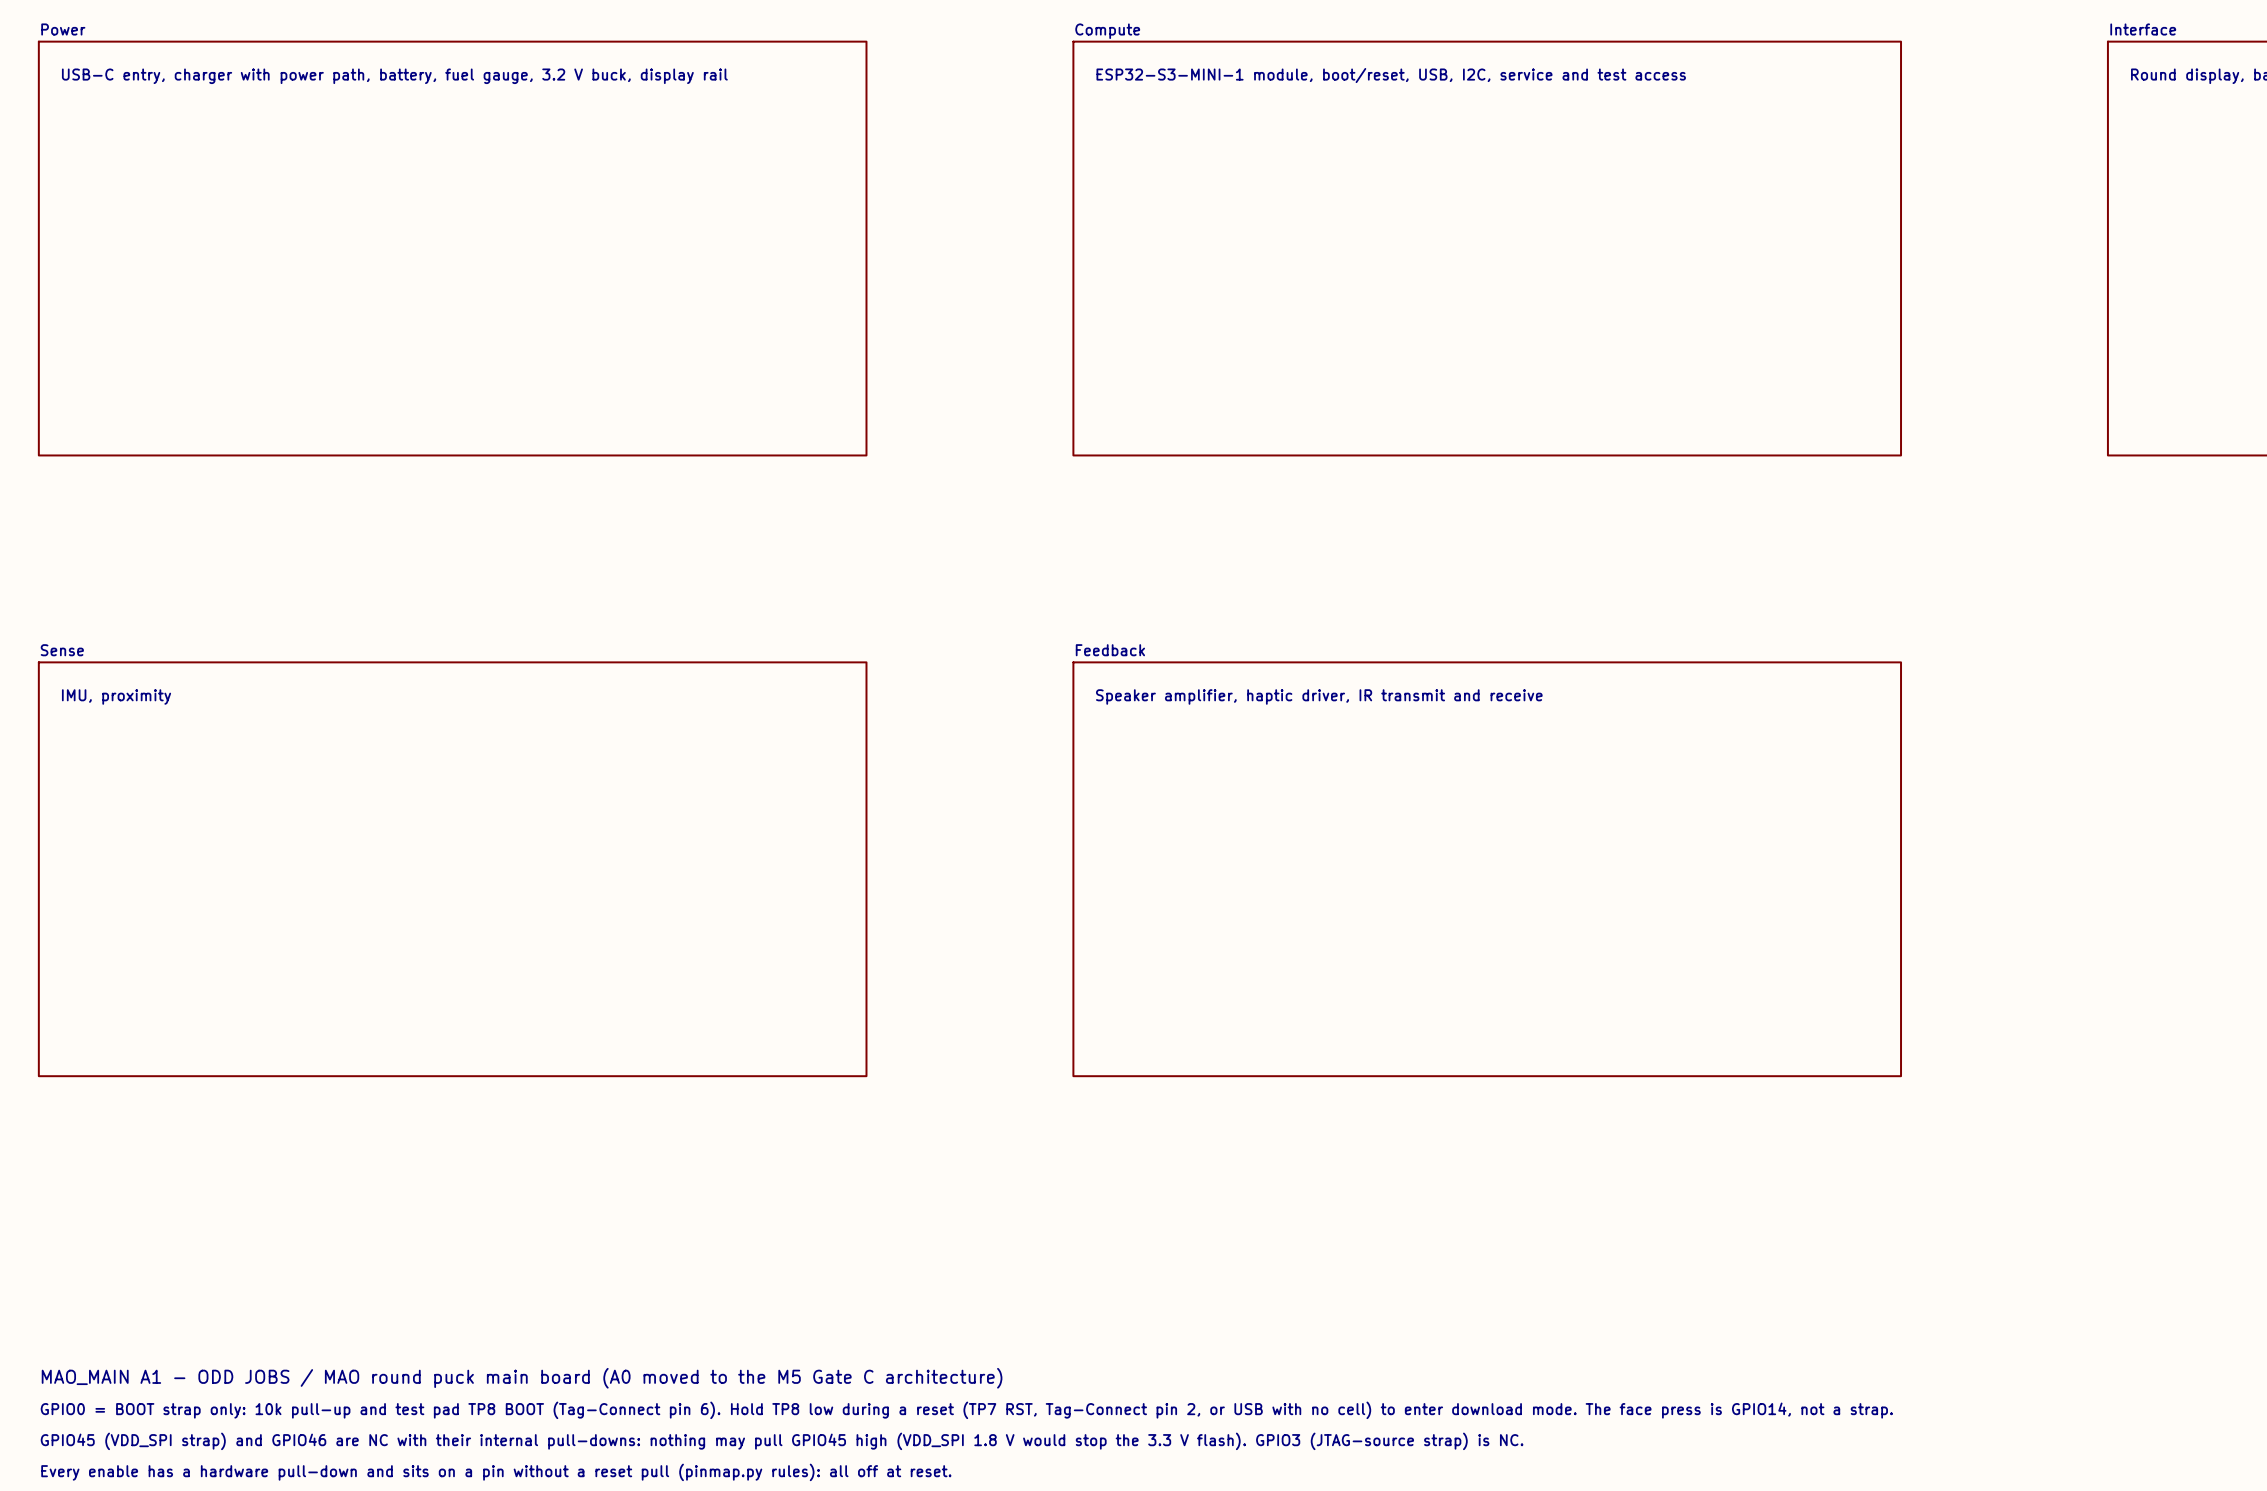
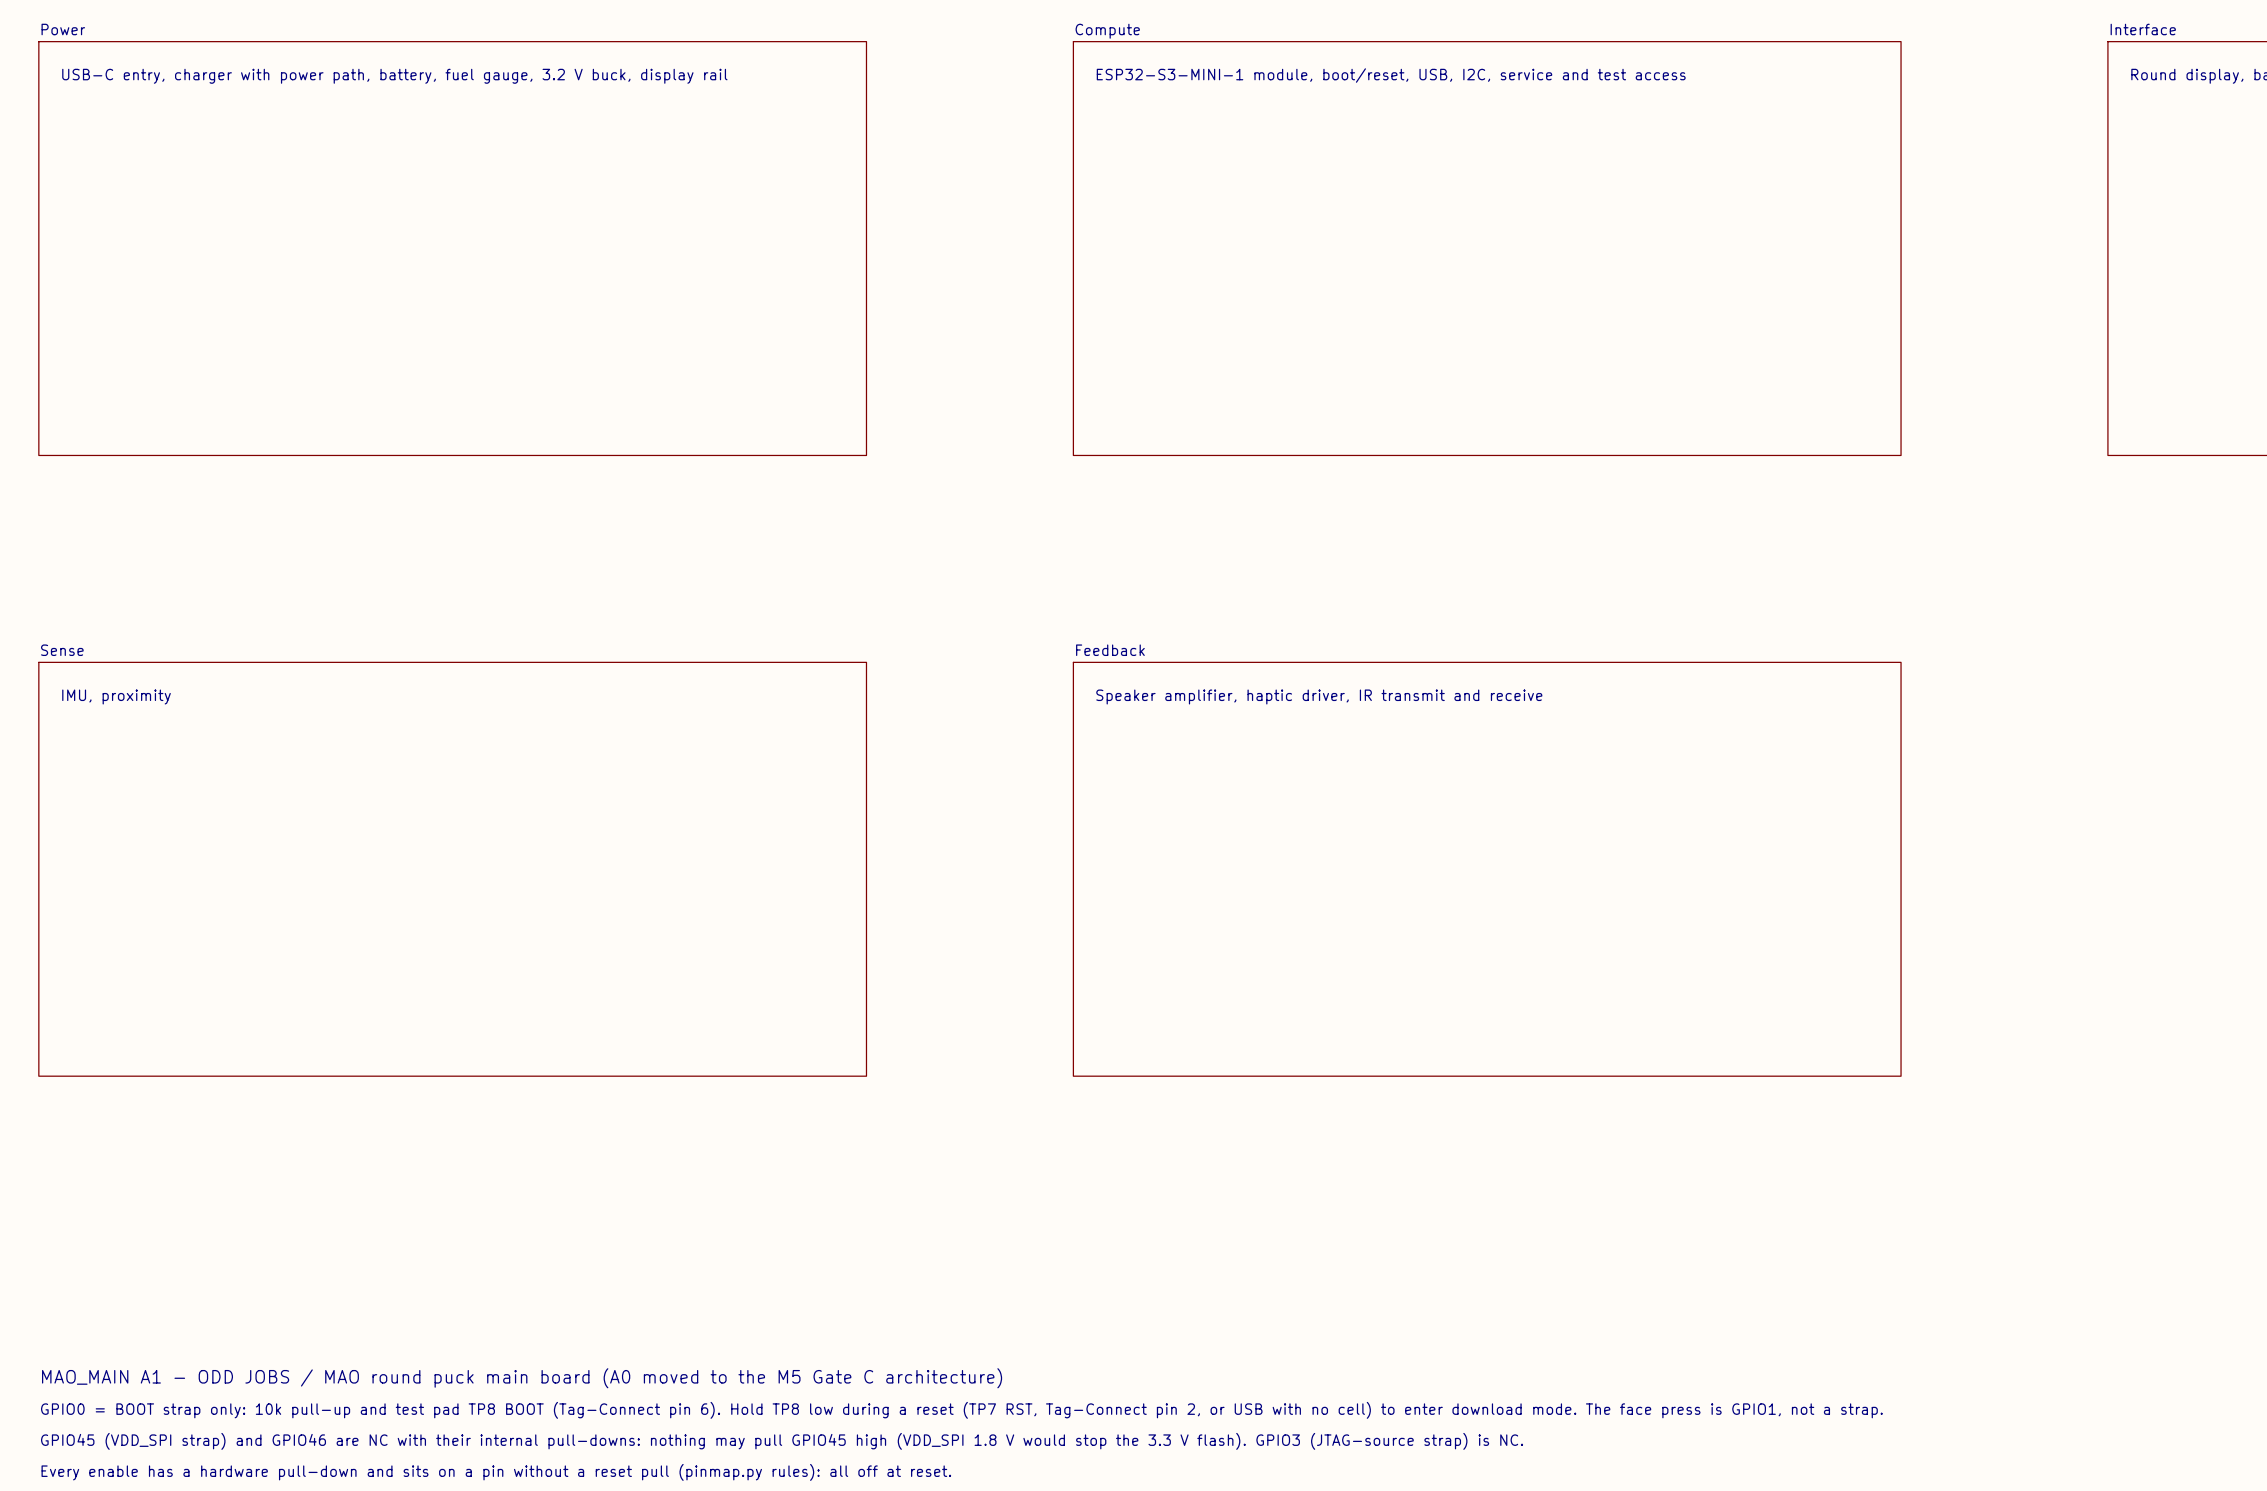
text: GPIO0 = BOOT strap only: 10k pull-up and test pad TP8 BOOT (Tag-Connect pin 6). Hold TP8 low during a reset (TP7 RST, Tag-Connect pin 2, or USB with no cell) to enter download mode. The face press is GPIO14, not a strap. (966, 1410) -> GPIO0 = BOOT strap only: 10k pull-up and test pad TP8 BOOT (Tag-Connect pin 6). Hold TP8 low during a reset (TP7 RST, Tag-Connect pin 2, or USB with no cell) to enter download mode. The face press is GPIO1, not a strap. (961, 1410)

